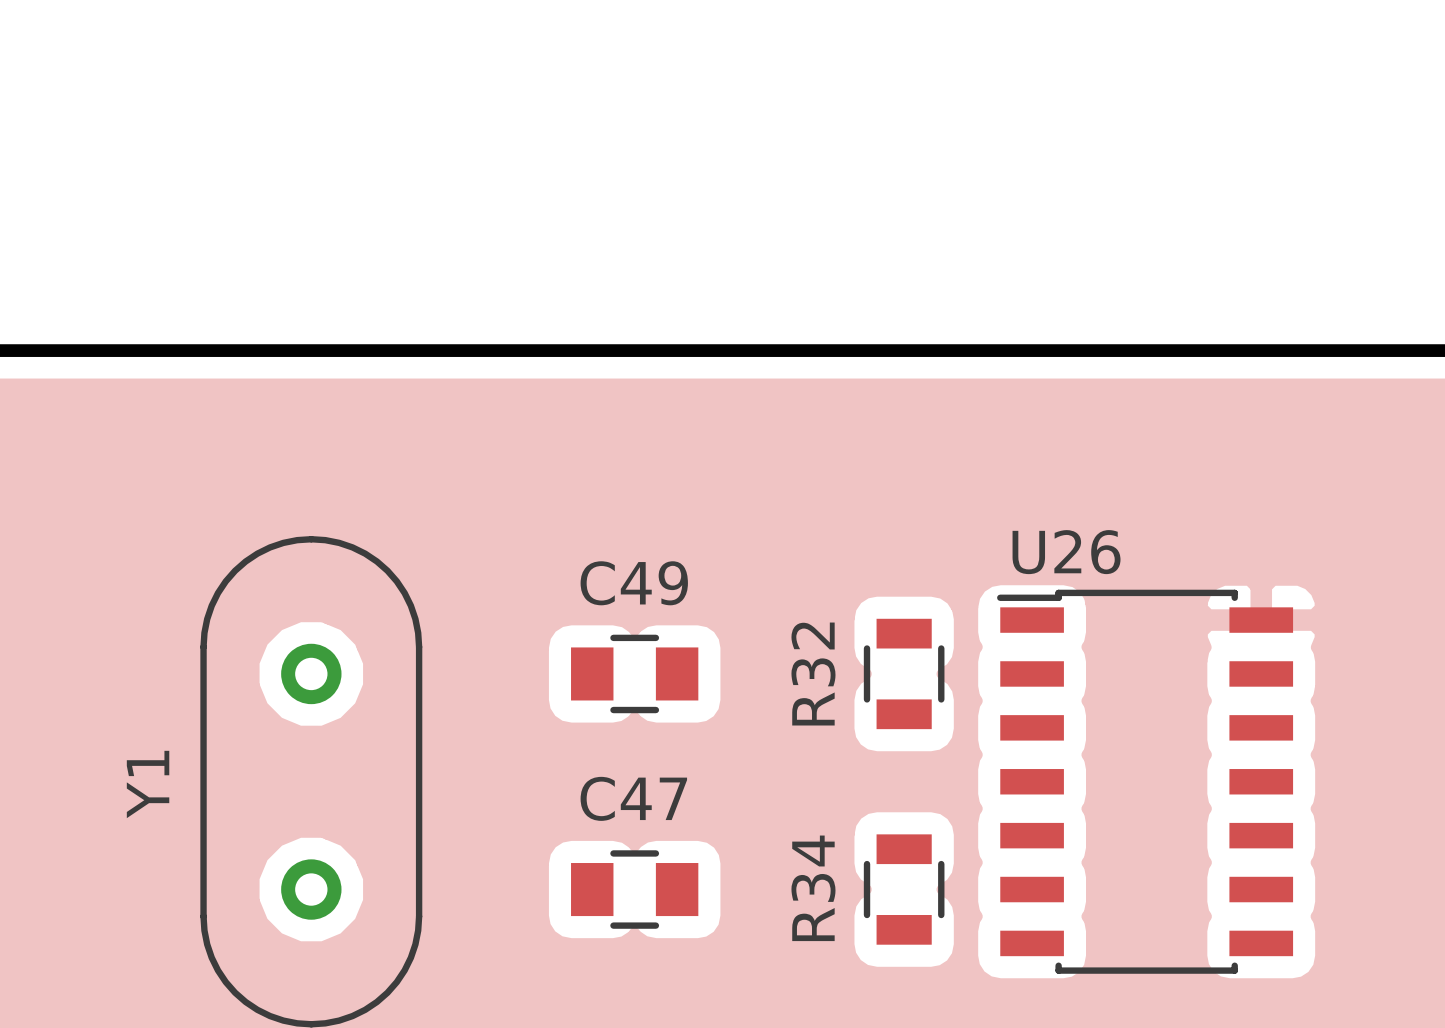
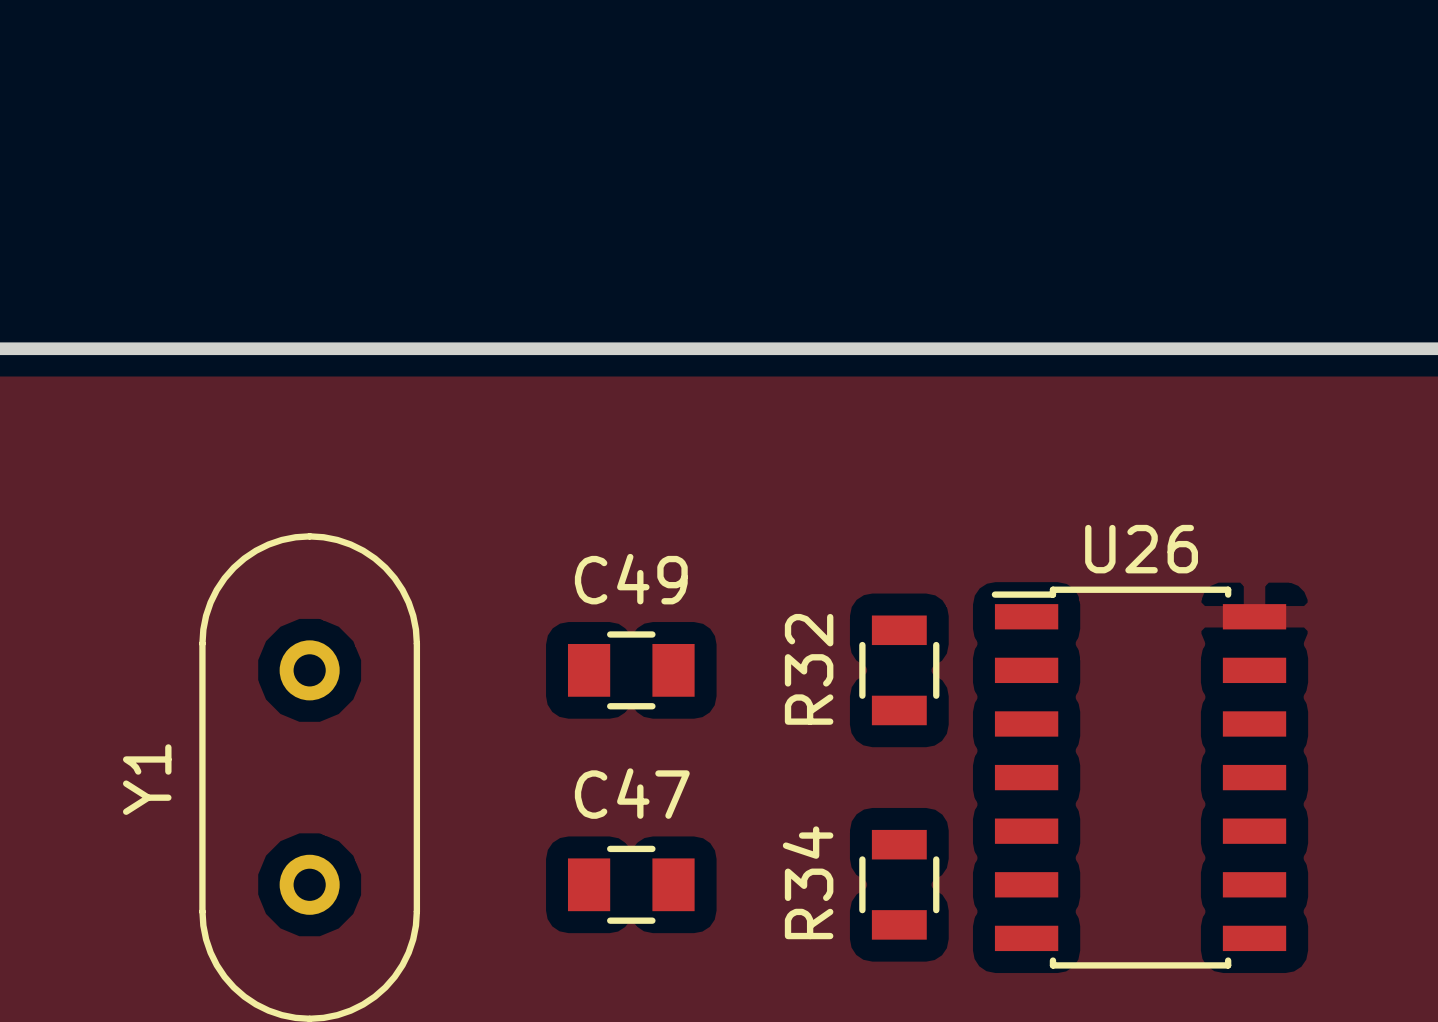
U26 name position: U26 (1066, 552) -> U26 (1141, 549)

